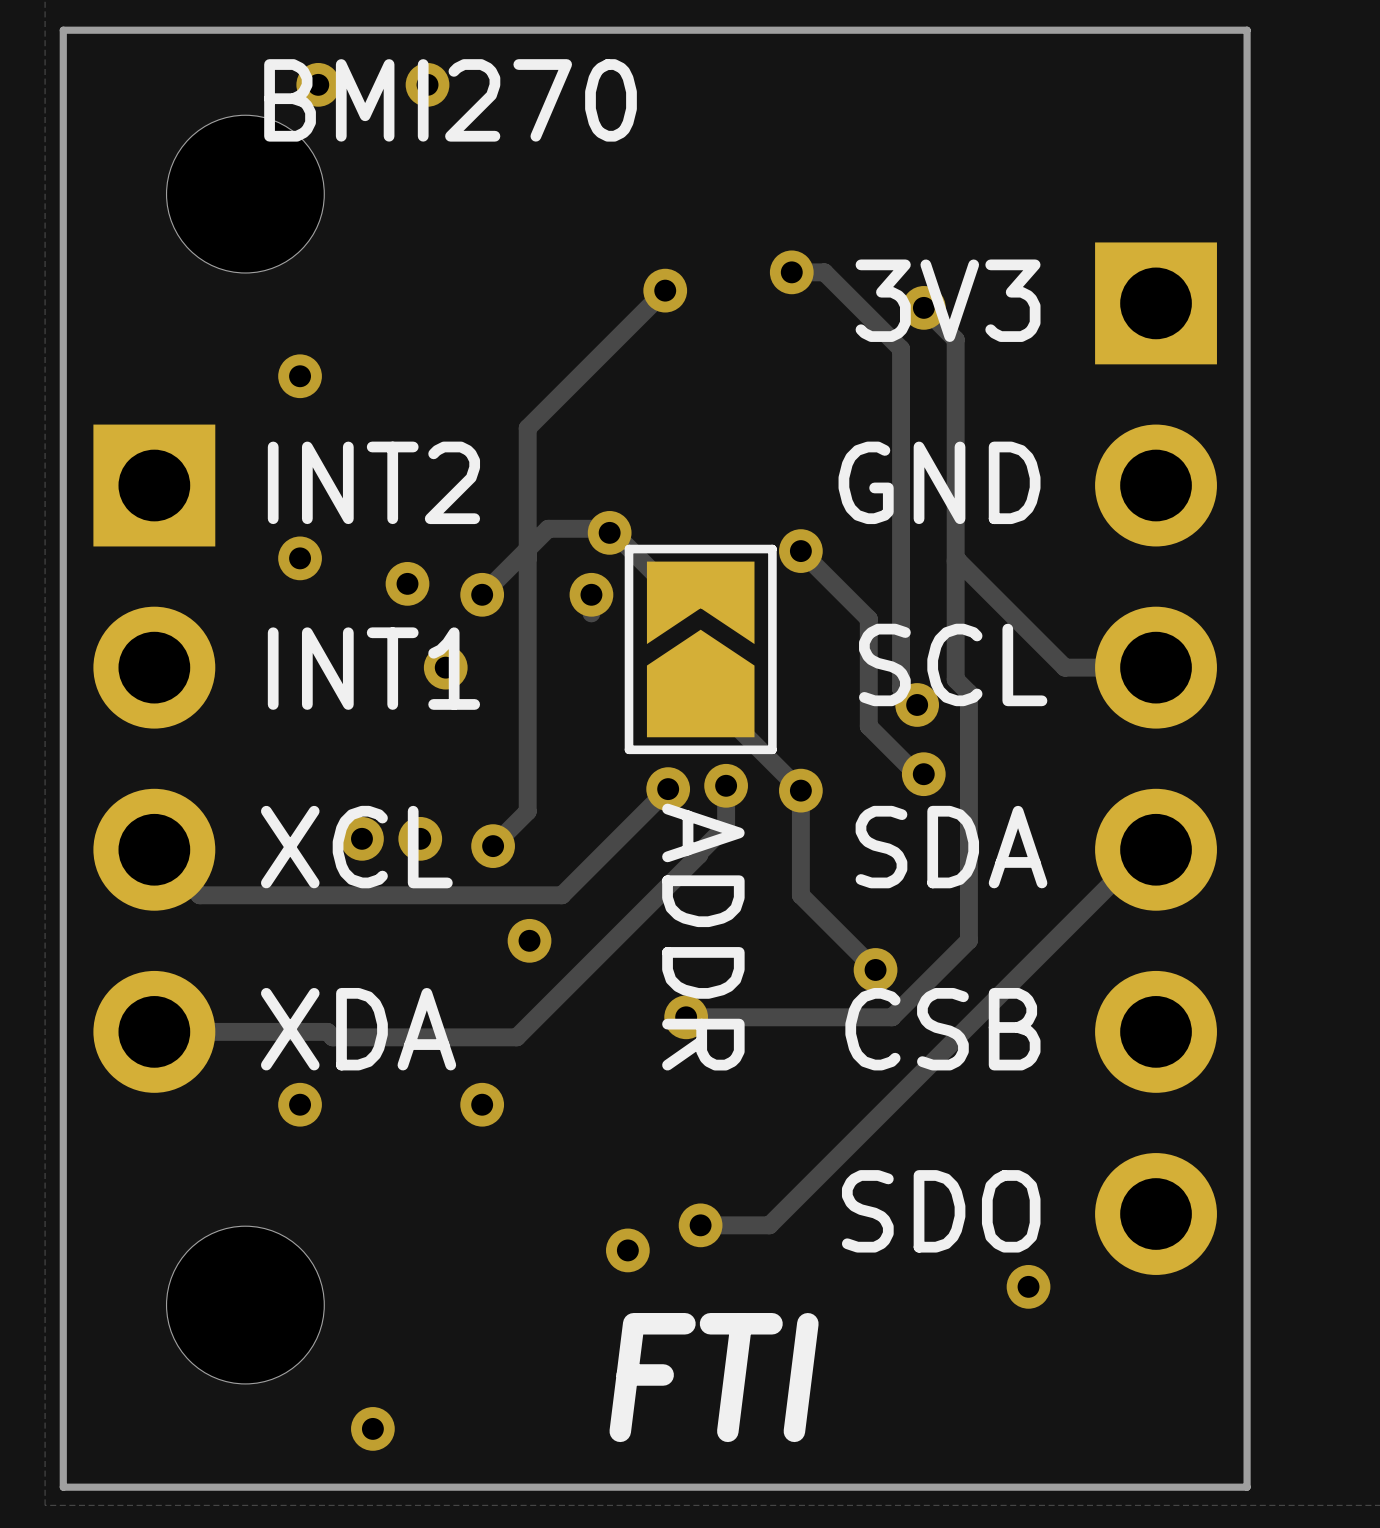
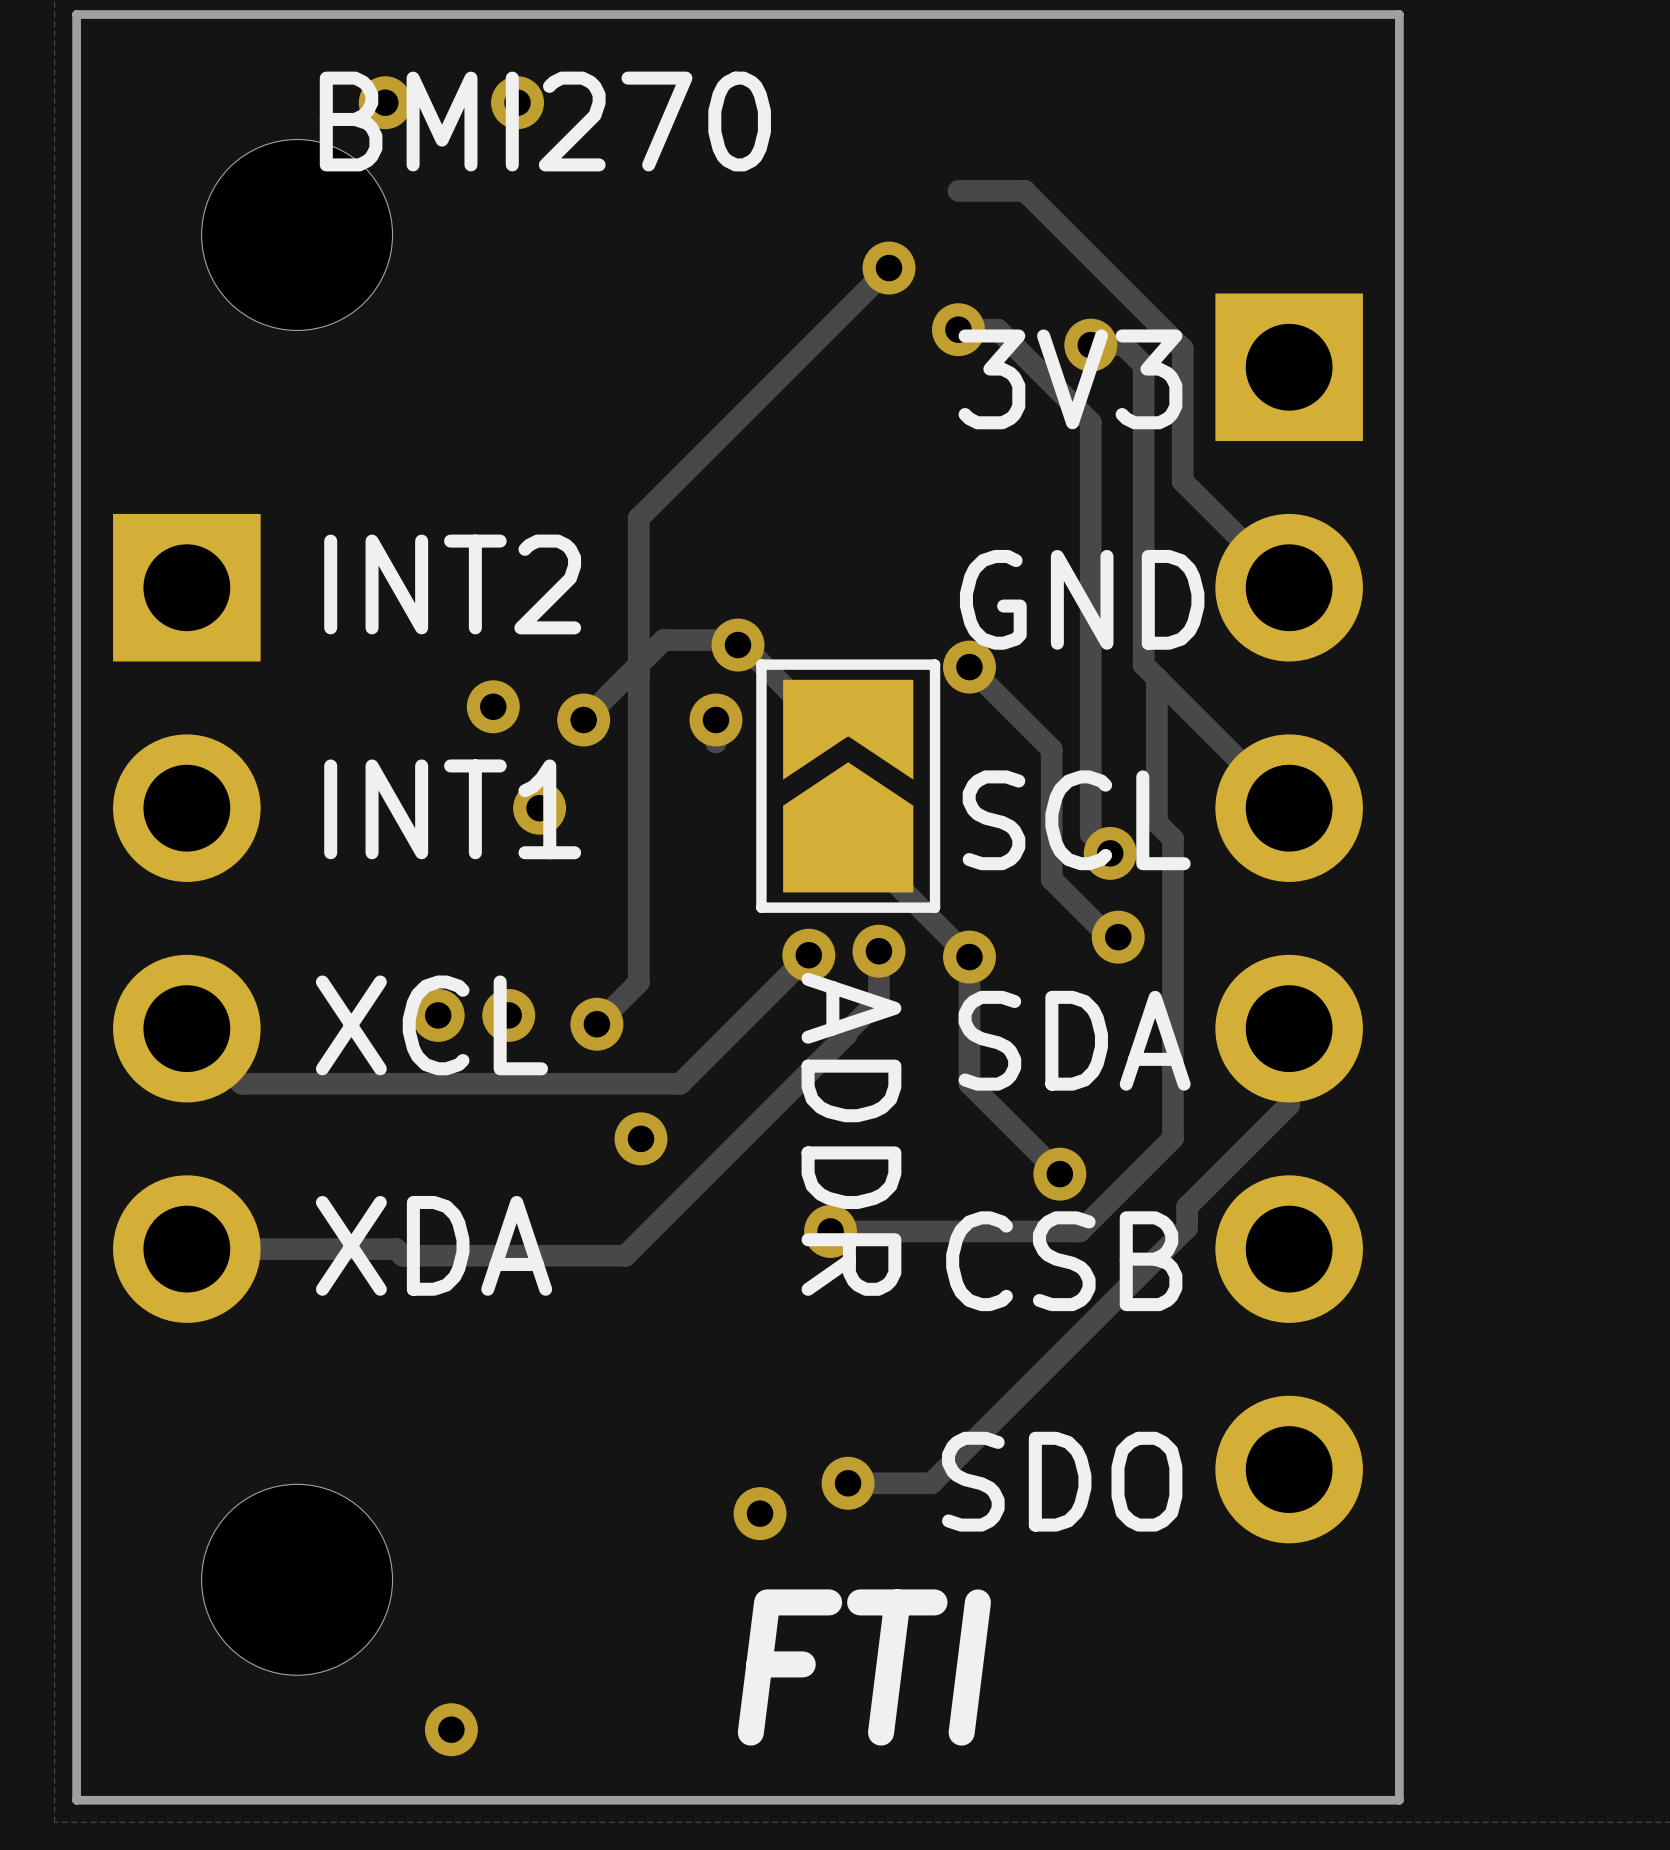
board edge: (63, 30) (1247, 30) (1247, 1487) (1156, 1487) -> (76, 36) (76, 14) (1399, 14) (1399, 1800)
track: none -> (958, 190) (1024, 190) (1182, 348) (1182, 481) (1289, 587)
track: none -> (889, 268) (805, 351)
via position: (665, 290) -> (889, 268)
text position: 3V3 (948, 300) -> 3V3 (1070, 379)
track: (923, 307) (955, 339) (955, 560) -> (1090, 345) (1123, 345) (1143, 365) (1143, 664) (1156, 678)
via position: (923, 307) -> (1090, 345)
via: (300, 376) -> none
text position: GND (939, 482) -> GND (1082, 599)
via: (300, 558) -> none
track: (956, 561) (1064, 667) (1147, 667) -> (1157, 679) (1291, 812)
text position: SCL (953, 664) -> SCL (1076, 820)
part position: (1156, 758) -> (1289, 918)
text position: SDA (951, 847) -> SDA (1074, 1040)
track: (1147, 849) (980, 1014) -> (1289, 1028) (1289, 1104) (1187, 1206) (1187, 1227)
text position: CSB (942, 1029) -> CSB (1064, 1261)
via: (300, 1104) -> none
via: (482, 1104) -> none
text position: SDO (941, 1211) -> SDO (1062, 1481)
via: (1028, 1286) -> none

